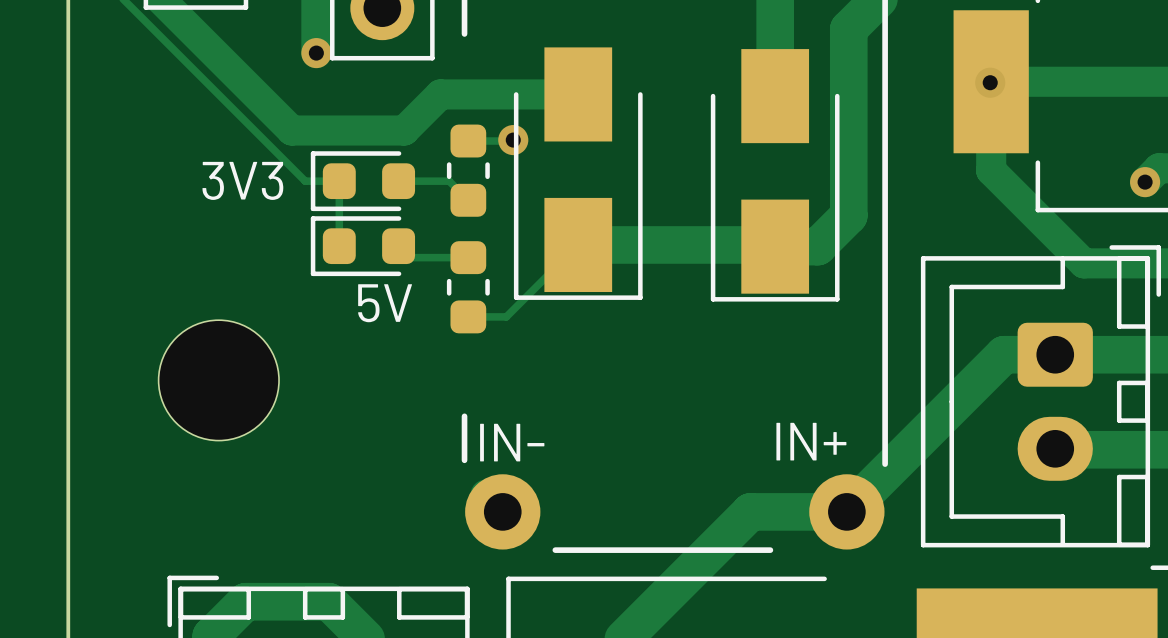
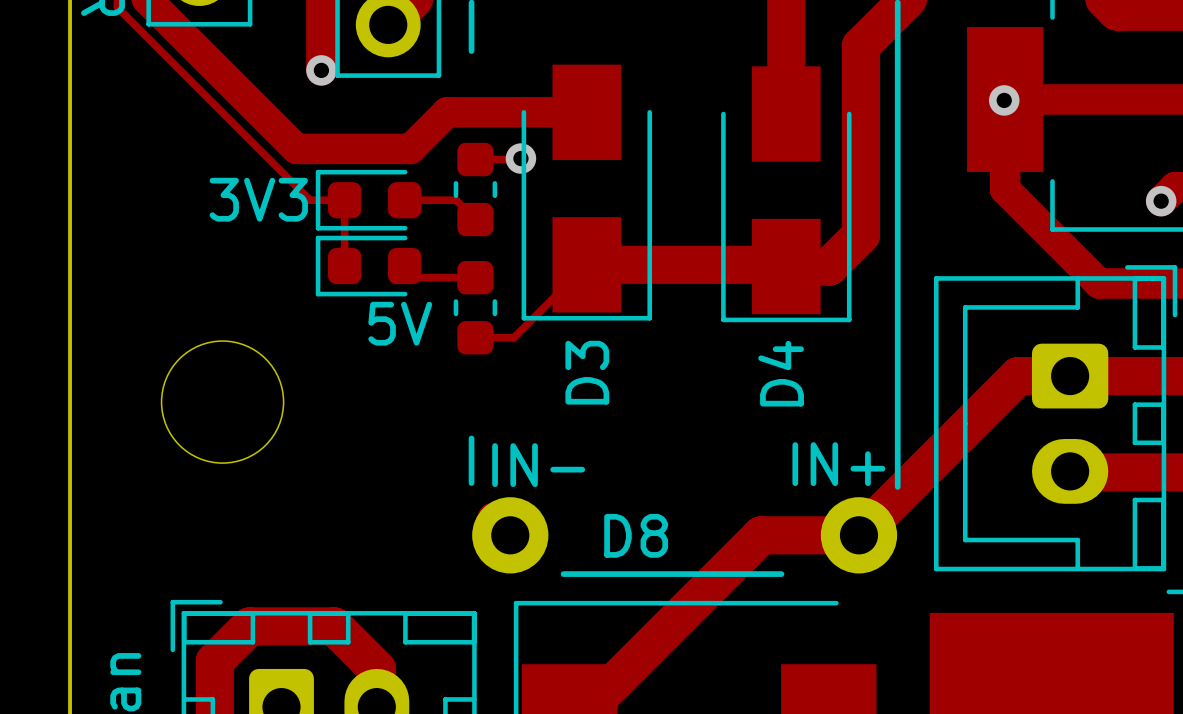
D3 name: none -> D3 (587, 372)
D4 name: none -> D4 (781, 373)
D8 name: none -> D8 (636, 535)

